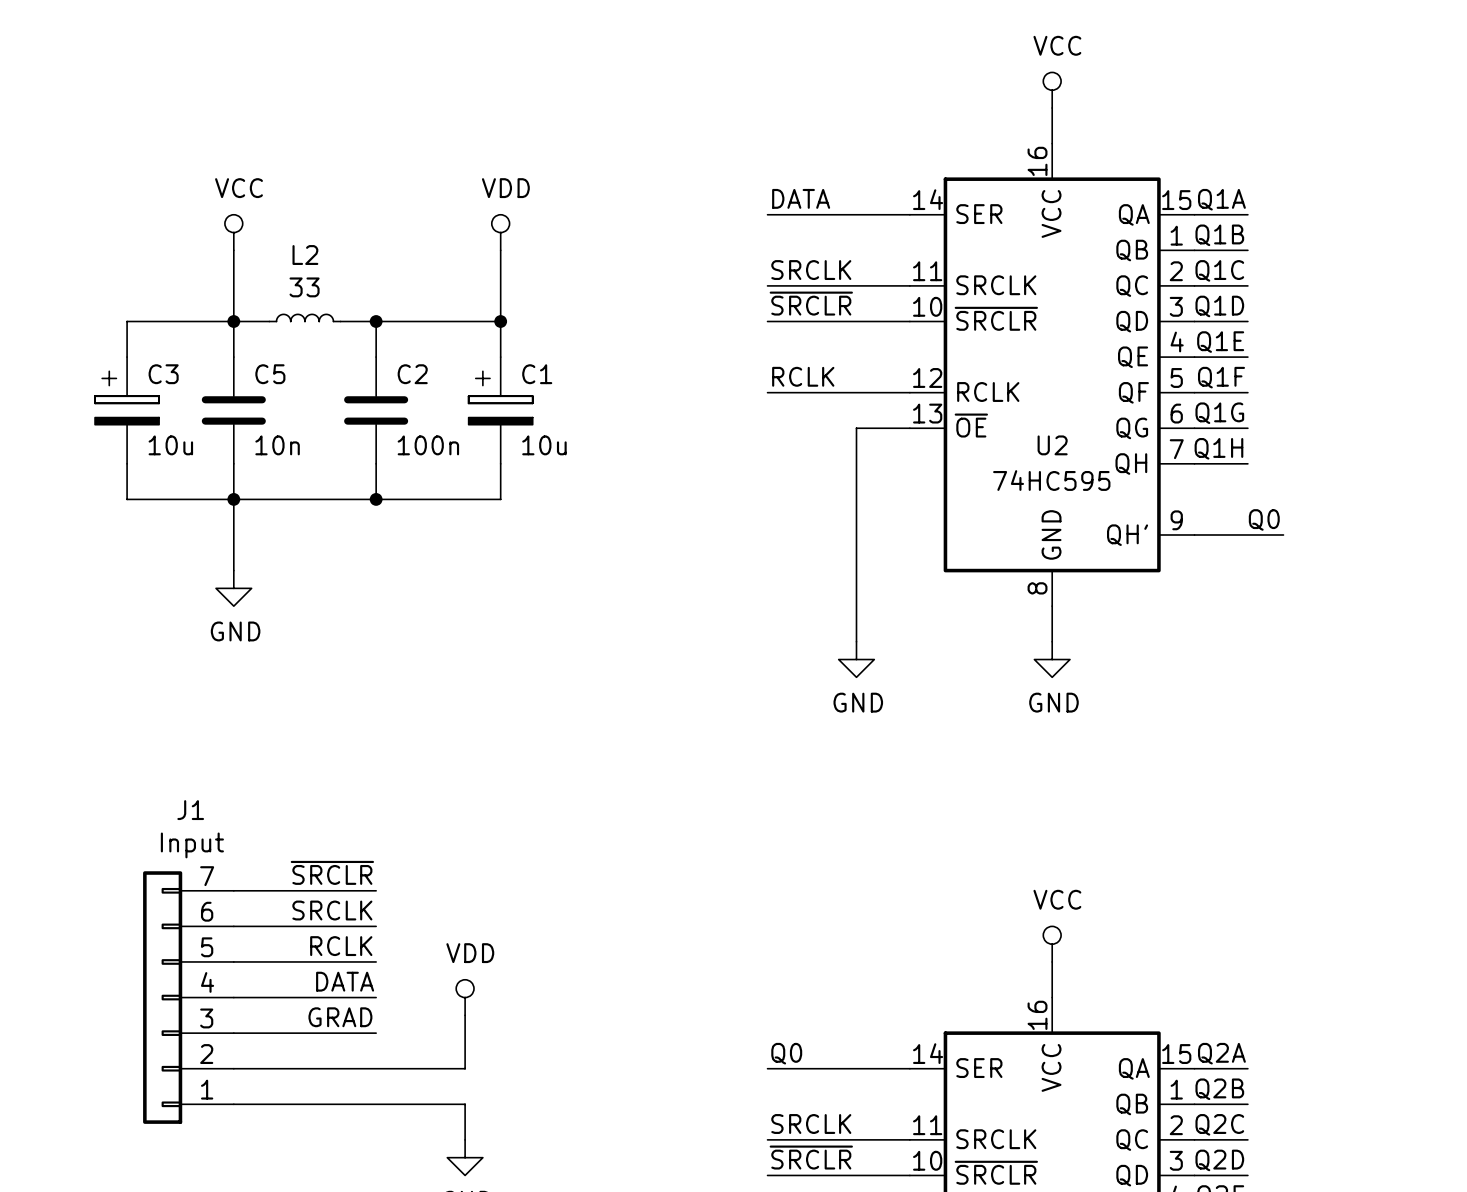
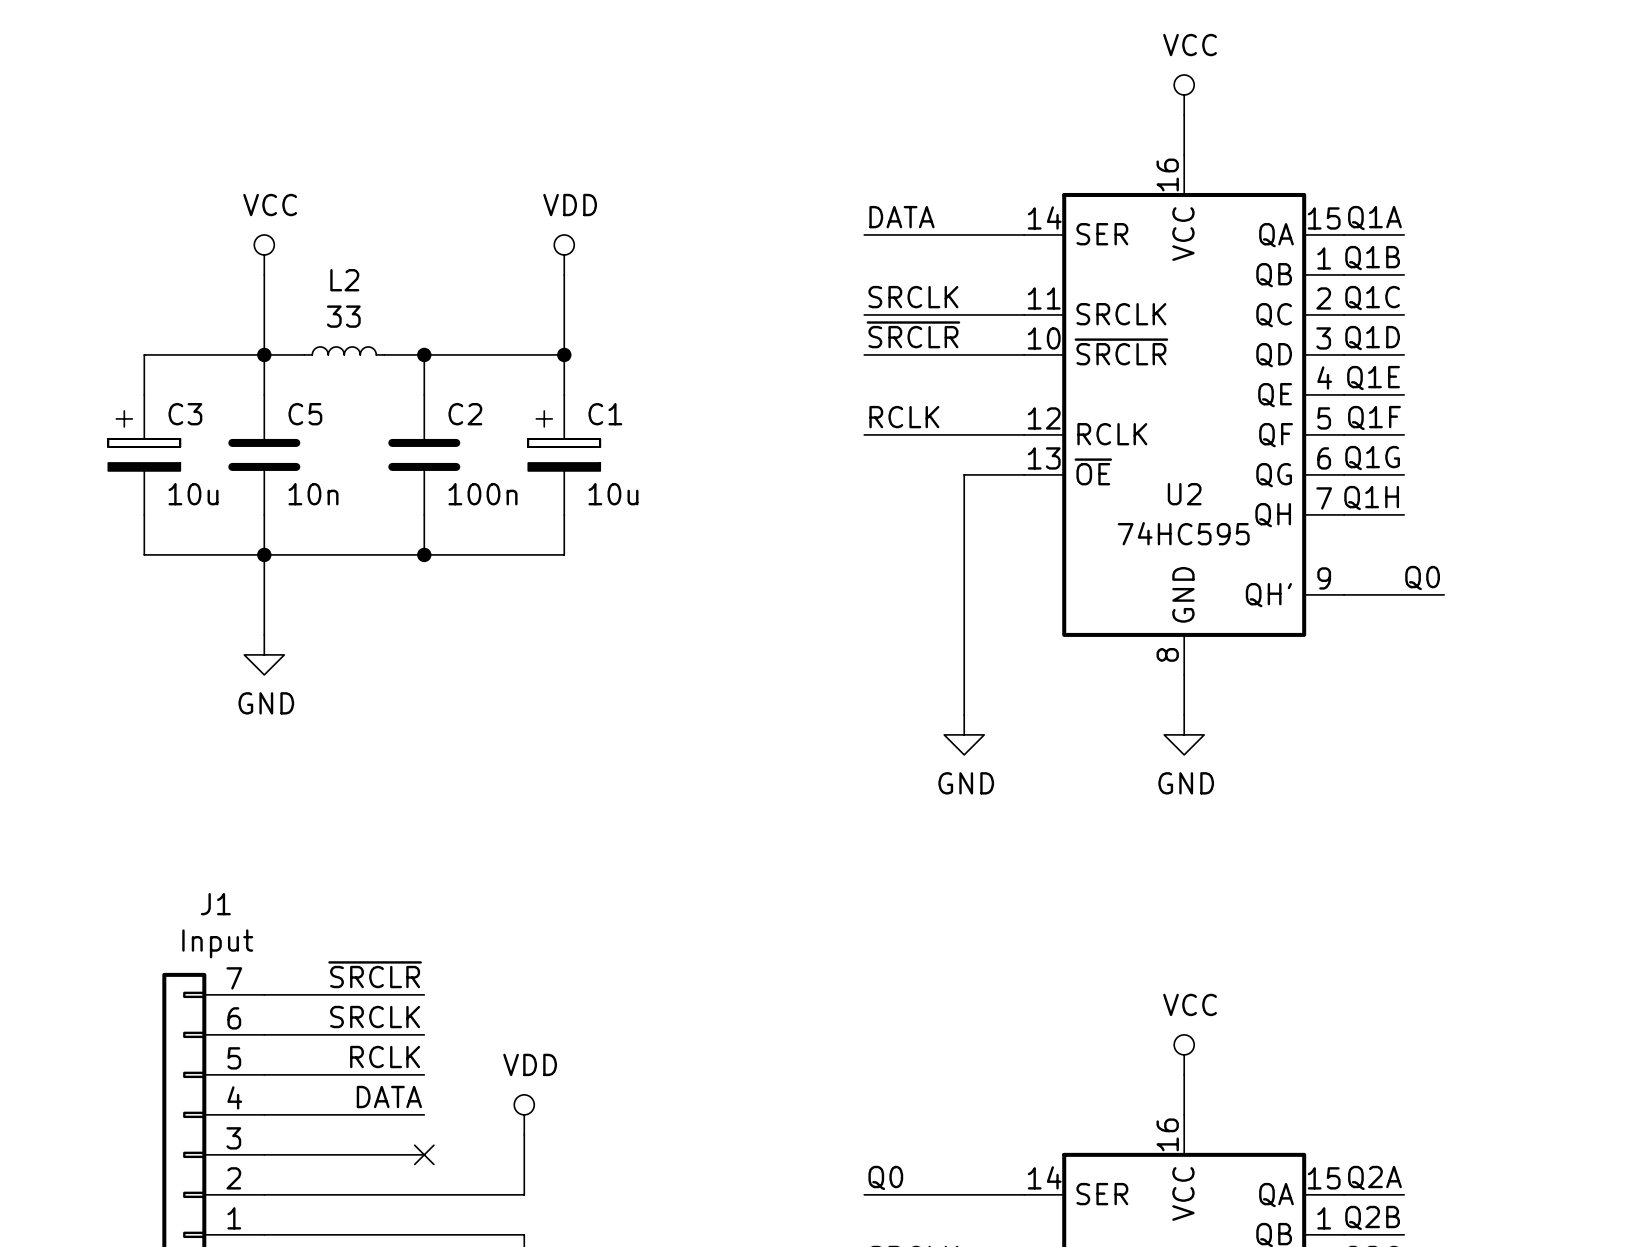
label: GRAD (340, 1017) -> none
no-connect mark: none -> (424, 1154)

